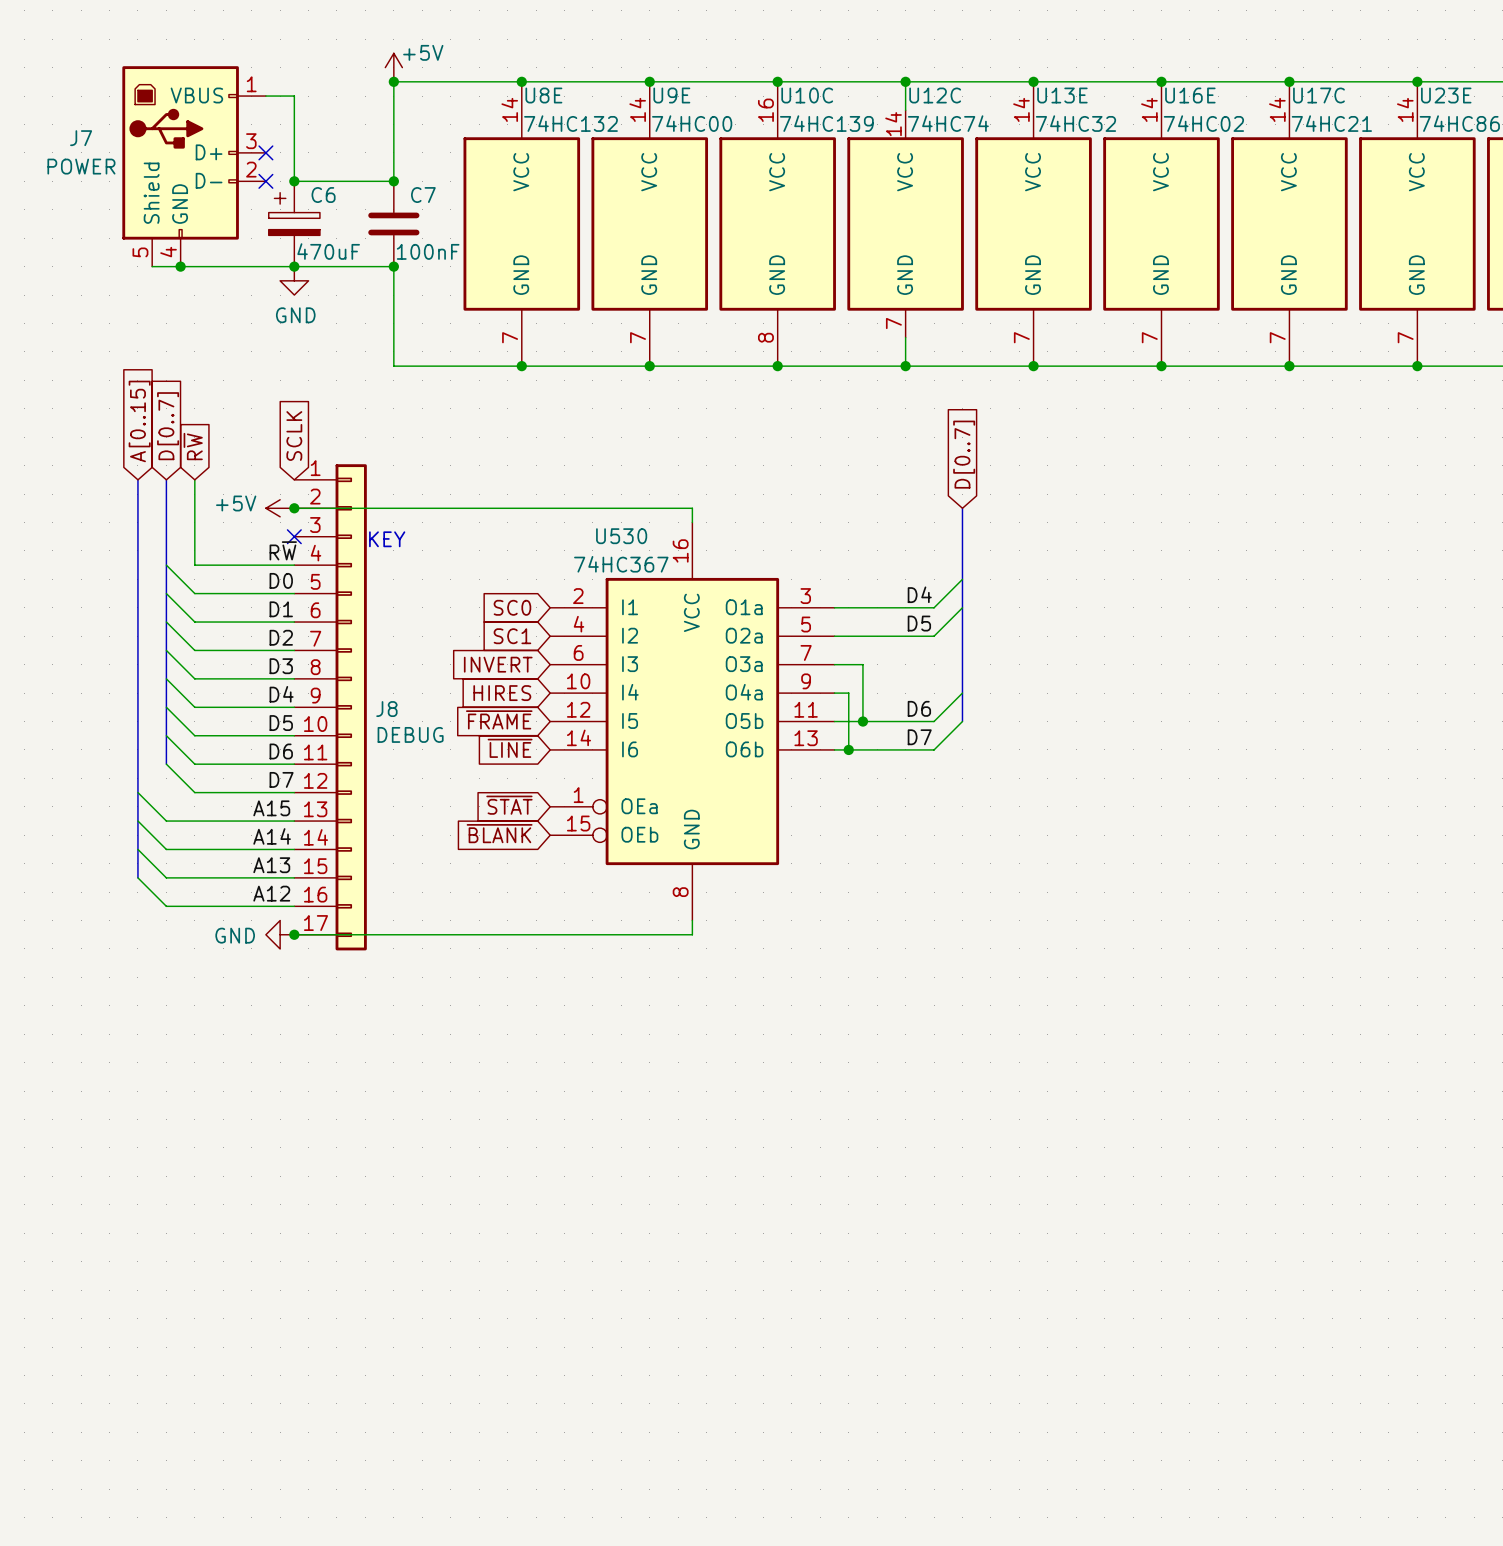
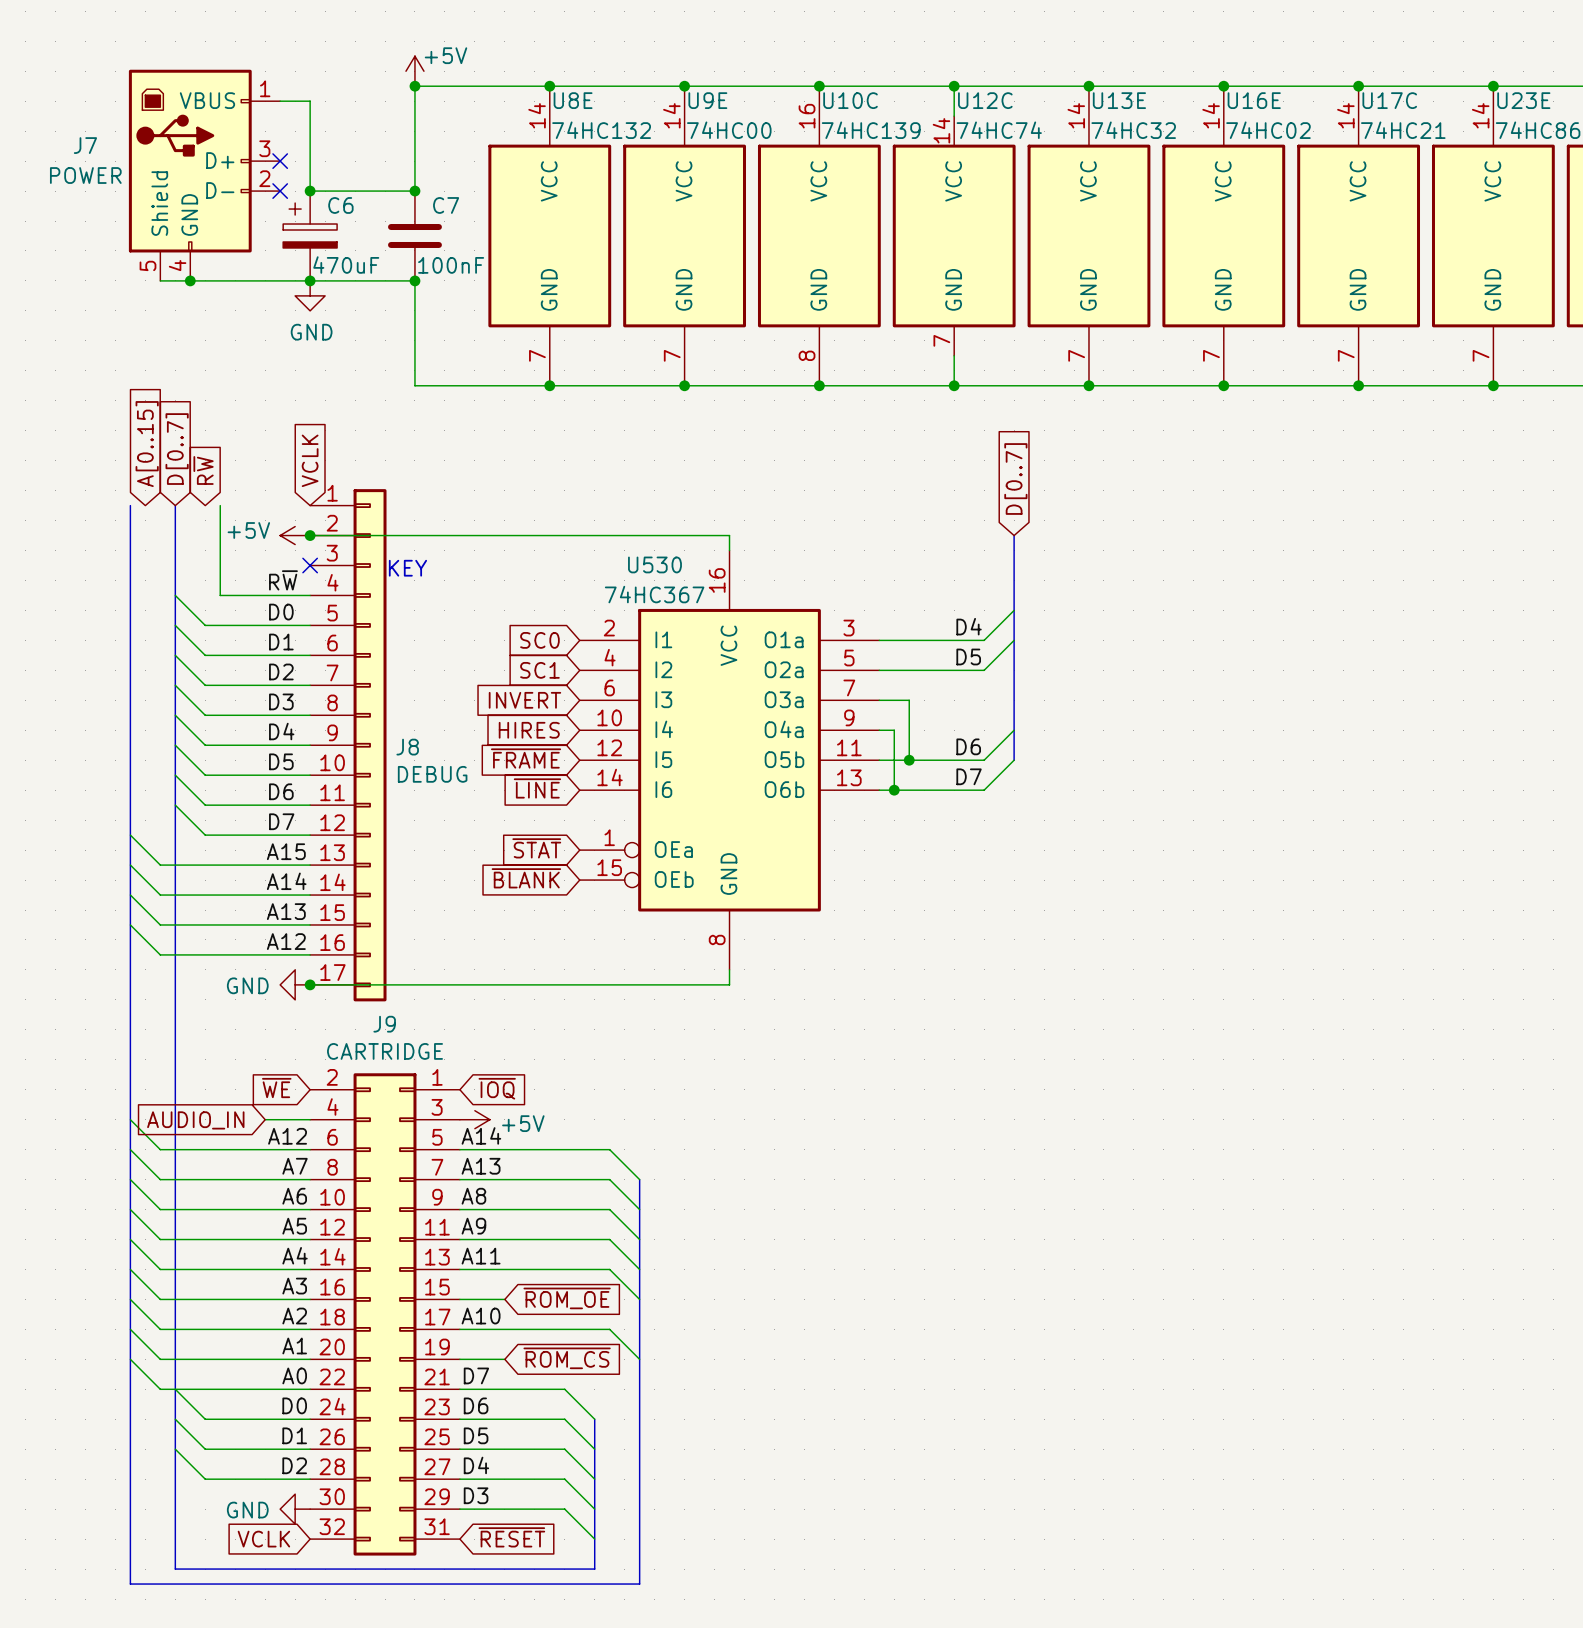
global label: SCLK (294, 436) -> VCLK (310, 460)
bus: none -> (130, 505) (130, 1584) (639, 1584) (639, 1179)
bus: (137, 479) (137, 877) -> none
wire: (194, 479) (194, 565) (209, 565) -> (220, 505) (220, 595)
label position: R~{W} (283, 550) -> R~{W} (283, 580)
label position: D0 (281, 580) -> D0 (281, 612)
label position: D1 (281, 609) -> D1 (281, 642)
label position: D2 (281, 637) -> D2 (281, 671)
label position: D3 (281, 666) -> D3 (281, 701)
label position: D4 (281, 694) -> D4 (281, 731)
label position: D5 (281, 723) -> D5 (281, 761)
label position: D6 (281, 751) -> D6 (281, 791)
bus: none -> (175, 805) (175, 1569) (594, 1569) (594, 1419)
label position: D7 (281, 779) -> D7 (281, 821)
wire: (137, 792) (166, 821) -> (130, 835) (160, 865) (175, 865)
wire: (137, 821) (166, 849) -> (130, 865) (160, 895) (175, 895)
wire: (137, 849) (166, 877) -> (130, 895) (160, 924) (175, 924)
wire: (137, 877) (166, 906) -> (130, 924) (160, 954) (175, 954)
global label: none -> ~{WE} (276, 1088)
global label: none -> ~{IOQ} (497, 1088)
wire: none -> (130, 1119) (160, 1149) (310, 1149)
wire: none -> (265, 1119) (310, 1119)
power symbol: none -> +5V (474, 1119)
global label: none -> AUDIO_IN (195, 1120)
label: none -> A12 (287, 1136)
label: none -> A14 (481, 1135)
wire: none -> (130, 1149) (160, 1179) (310, 1179)
wire: none -> (459, 1149) (609, 1149) (639, 1179)
label: none -> A7 (295, 1166)
label: none -> A13 (481, 1166)
wire: none -> (130, 1179) (160, 1209) (310, 1209)
wire: none -> (459, 1179) (609, 1179) (639, 1209)
label: none -> A6 (294, 1196)
label: none -> A8 (473, 1196)
wire: none -> (130, 1209) (160, 1239) (310, 1239)
wire: none -> (459, 1209) (609, 1209) (639, 1239)
label: none -> A5 (294, 1226)
label: none -> A9 (473, 1226)
wire: none -> (130, 1239) (160, 1269) (310, 1269)
wire: none -> (459, 1239) (609, 1239) (639, 1269)
label: none -> A4 (295, 1255)
label: none -> A11 (481, 1256)
wire: none -> (130, 1269) (160, 1299) (310, 1299)
wire: none -> (459, 1269) (609, 1269) (639, 1299)
label: none -> A3 (294, 1286)
global label: none -> ~{ROM_OE} (567, 1298)
wire: none -> (130, 1299) (160, 1329) (310, 1329)
wire: none -> (459, 1299) (504, 1299)
J9: none -> CARTRIDGE (385, 1314)
label: none -> A2 (294, 1316)
label: none -> A10 (481, 1316)
wire: none -> (130, 1329) (160, 1359) (310, 1359)
wire: none -> (459, 1329) (609, 1329) (639, 1359)
label: none -> A1 (294, 1345)
global label: none -> ~{ROM_CS} (567, 1358)
wire: none -> (130, 1359) (160, 1389) (310, 1389)
wire: none -> (459, 1359) (504, 1359)
label: none -> A0 (294, 1375)
label: none -> D7 (476, 1375)
wire: none -> (175, 1389) (205, 1419) (310, 1419)
wire: none -> (459, 1389) (564, 1389) (594, 1419)
label: none -> D0 (294, 1405)
label: none -> D6 (476, 1405)
wire: none -> (175, 1419) (205, 1449) (310, 1449)
wire: none -> (459, 1419) (564, 1419) (594, 1449)
label: none -> D1 (294, 1435)
label: none -> D5 (476, 1435)
wire: none -> (175, 1449) (205, 1479) (310, 1479)
wire: none -> (459, 1449) (564, 1449) (594, 1479)
label: none -> D4 (476, 1465)
label: none -> D2 (294, 1465)
wire: none -> (459, 1479) (564, 1479) (594, 1509)
label: none -> D3 (476, 1495)
power symbol: none -> GND (295, 1509)
wire: none -> (459, 1509) (564, 1509) (594, 1539)
global label: none -> ~{RESET} (511, 1537)
global label: none -> VCLK (263, 1539)

